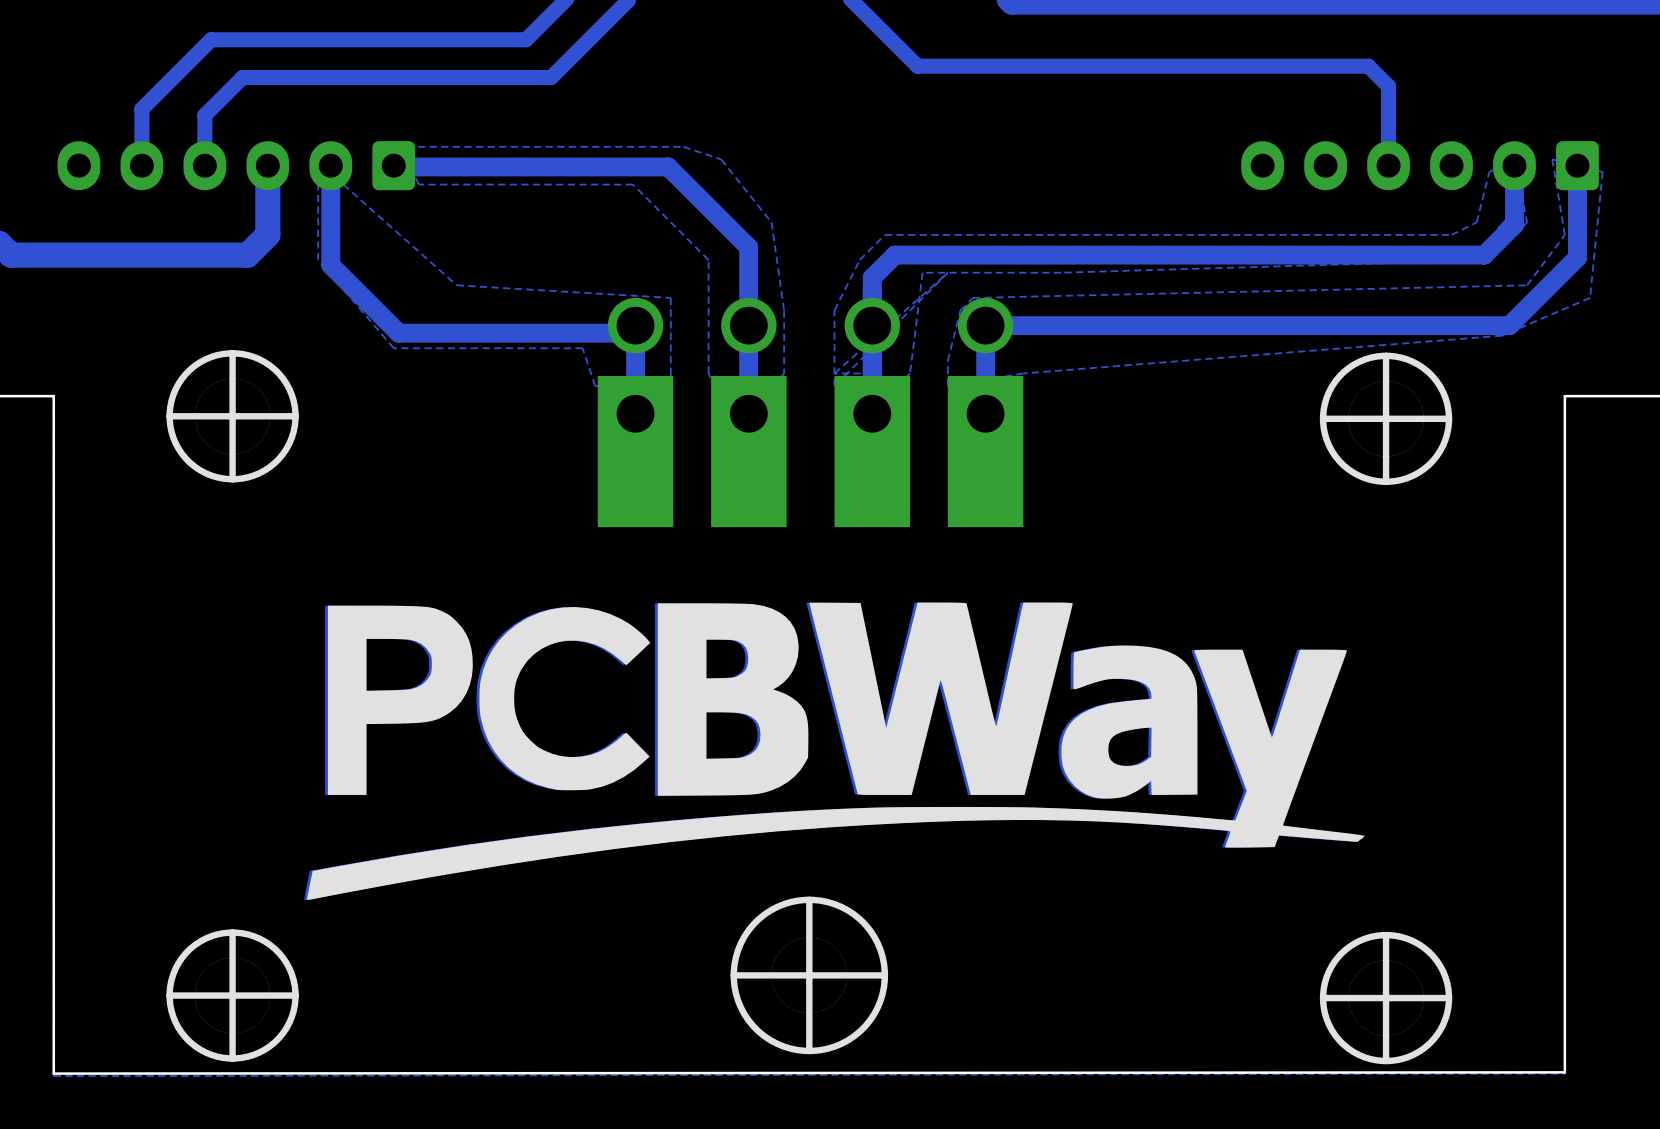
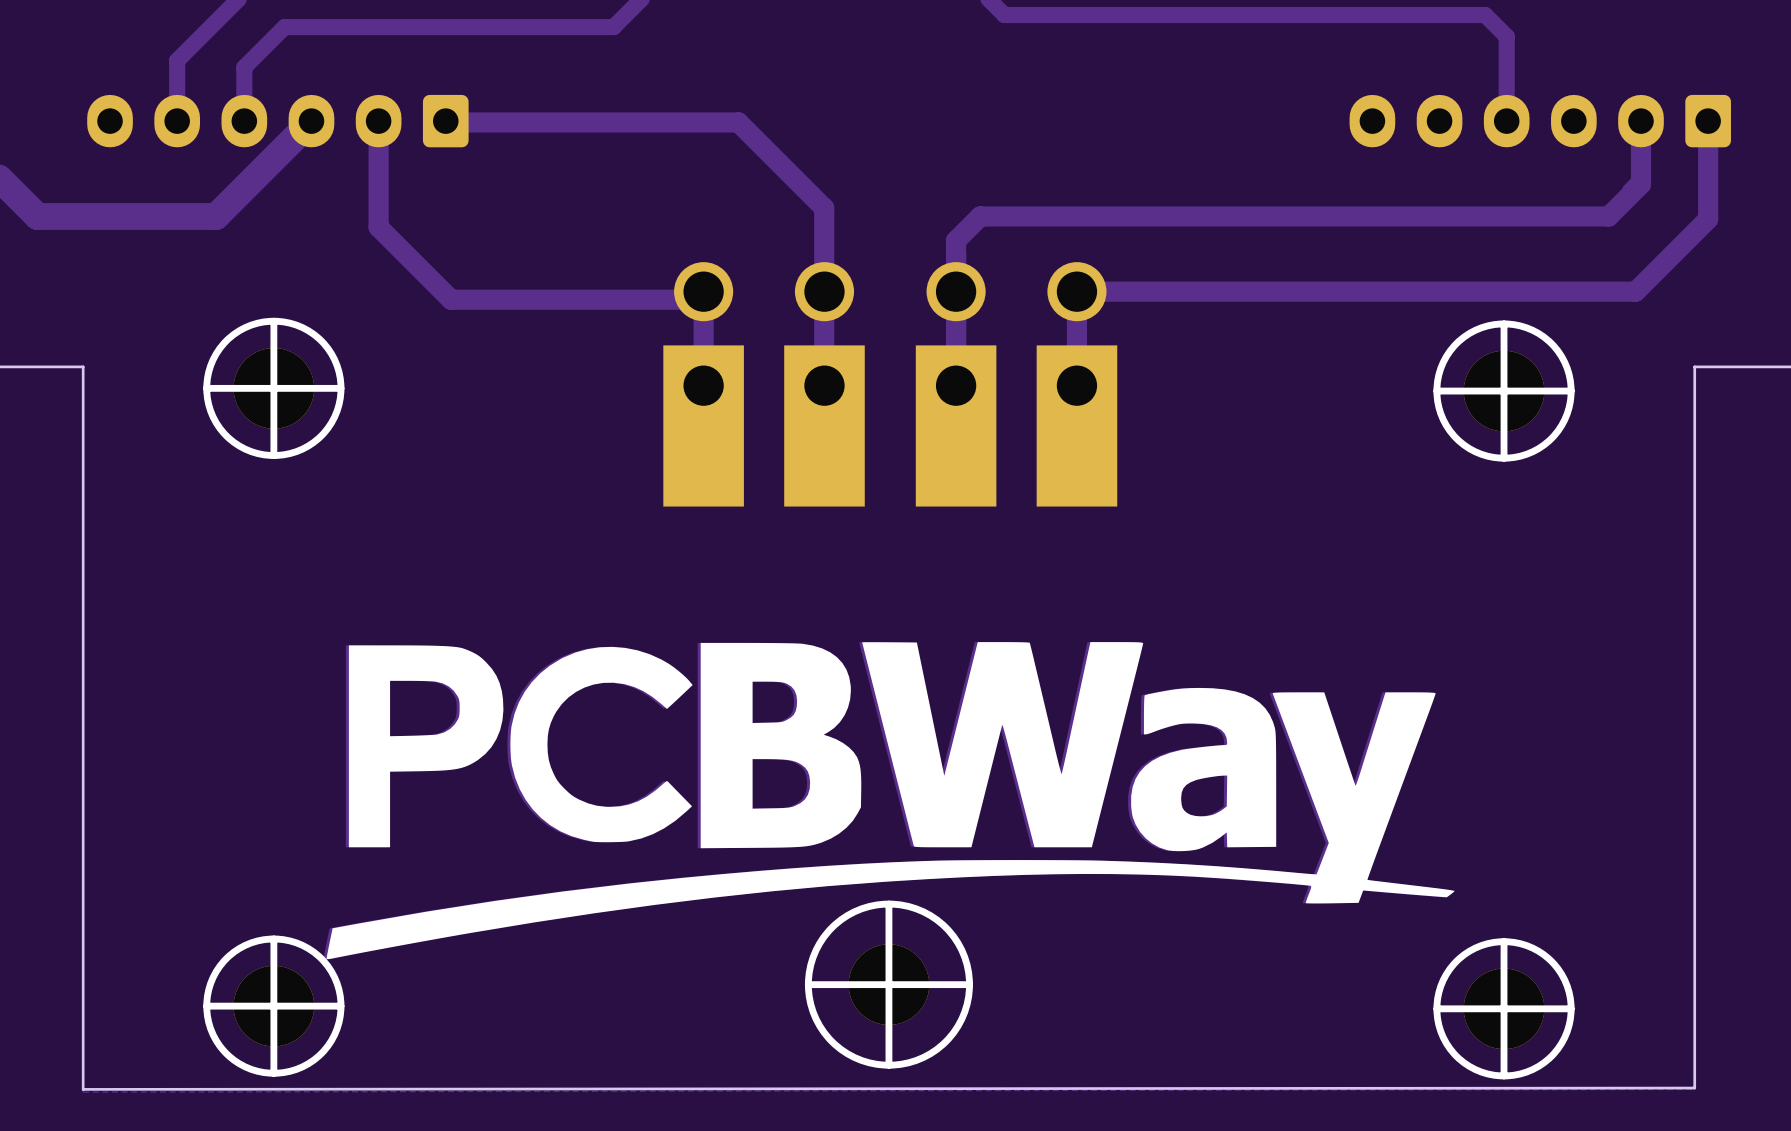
zone outline: (683, 146) (406, 146) (406, 159) (418, 184) (633, 184) (708, 260) (708, 373) (721, 398) (771, 386) (784, 373) (784, 310) (771, 222) (721, 159) (683, 146) -> none
zone outline: (1514, 159) (1489, 171) (1476, 222) (1451, 234) (884, 234) (859, 260) (834, 310) (834, 386) (947, 272) (834, 373) (872, 373) (897, 386) (910, 373) (922, 272) (1061, 272) (1489, 260) (1527, 222) (1514, 159) -> none
zone outline: (1552, 159) (1564, 234) (1527, 285) (973, 297) (960, 310) (947, 360) (947, 386) (1023, 373) (1501, 335) (1590, 297) (1602, 171) (1552, 159) -> none
track: (267, 165) (267, 234) (247, 255) (178, 255) -> (311, 121) (216, 216)
zone outline: (343, 184) (318, 184) (318, 260) (393, 348) (582, 348) (595, 386) (670, 386) (670, 297) (456, 285) (343, 184) -> none
drawing position: (834, 751) -> (889, 800)

